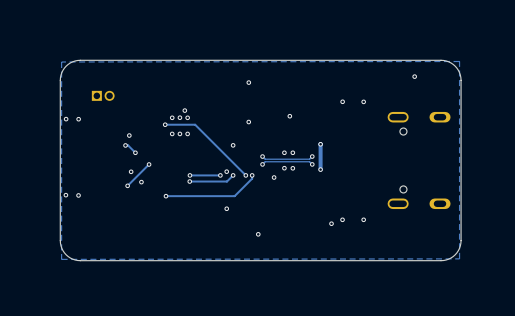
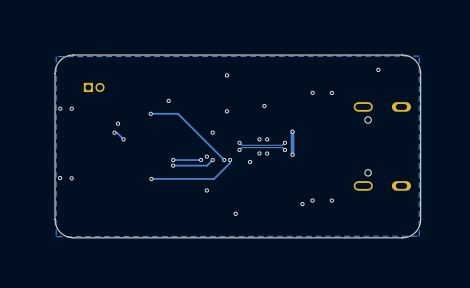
via: (172, 117) -> none
via: (179, 117) -> none
via: (187, 117) -> none
via: (172, 133) -> none
via: (179, 133) -> none
via: (187, 133) -> none
track: (148, 164) (127, 185) -> none
via: (149, 164) -> none
via: (131, 171) -> none
via: (141, 182) -> none
via: (127, 185) -> none

